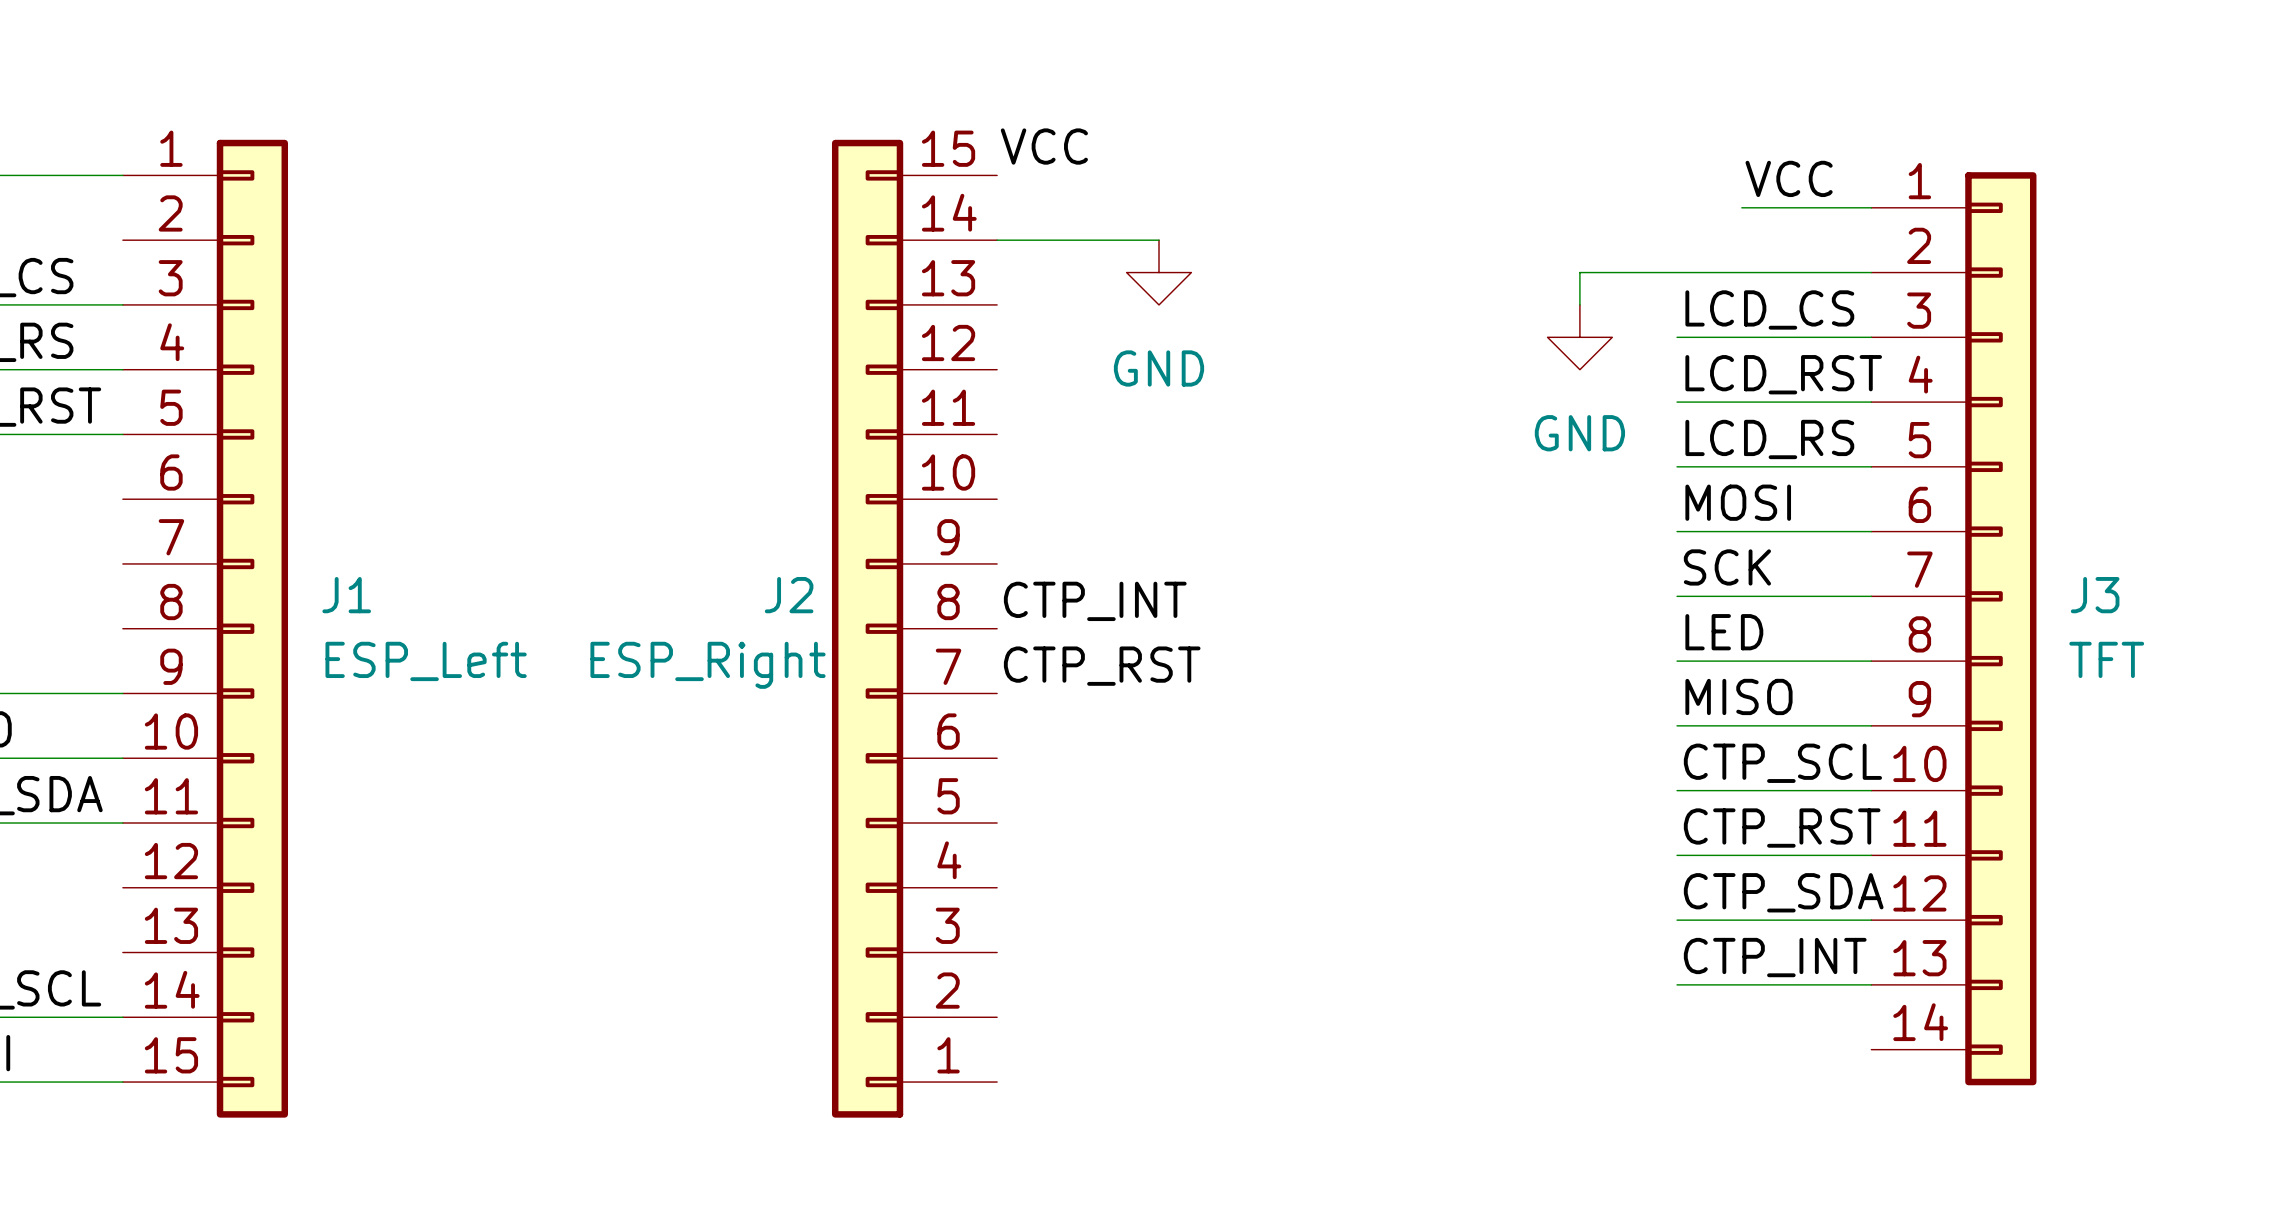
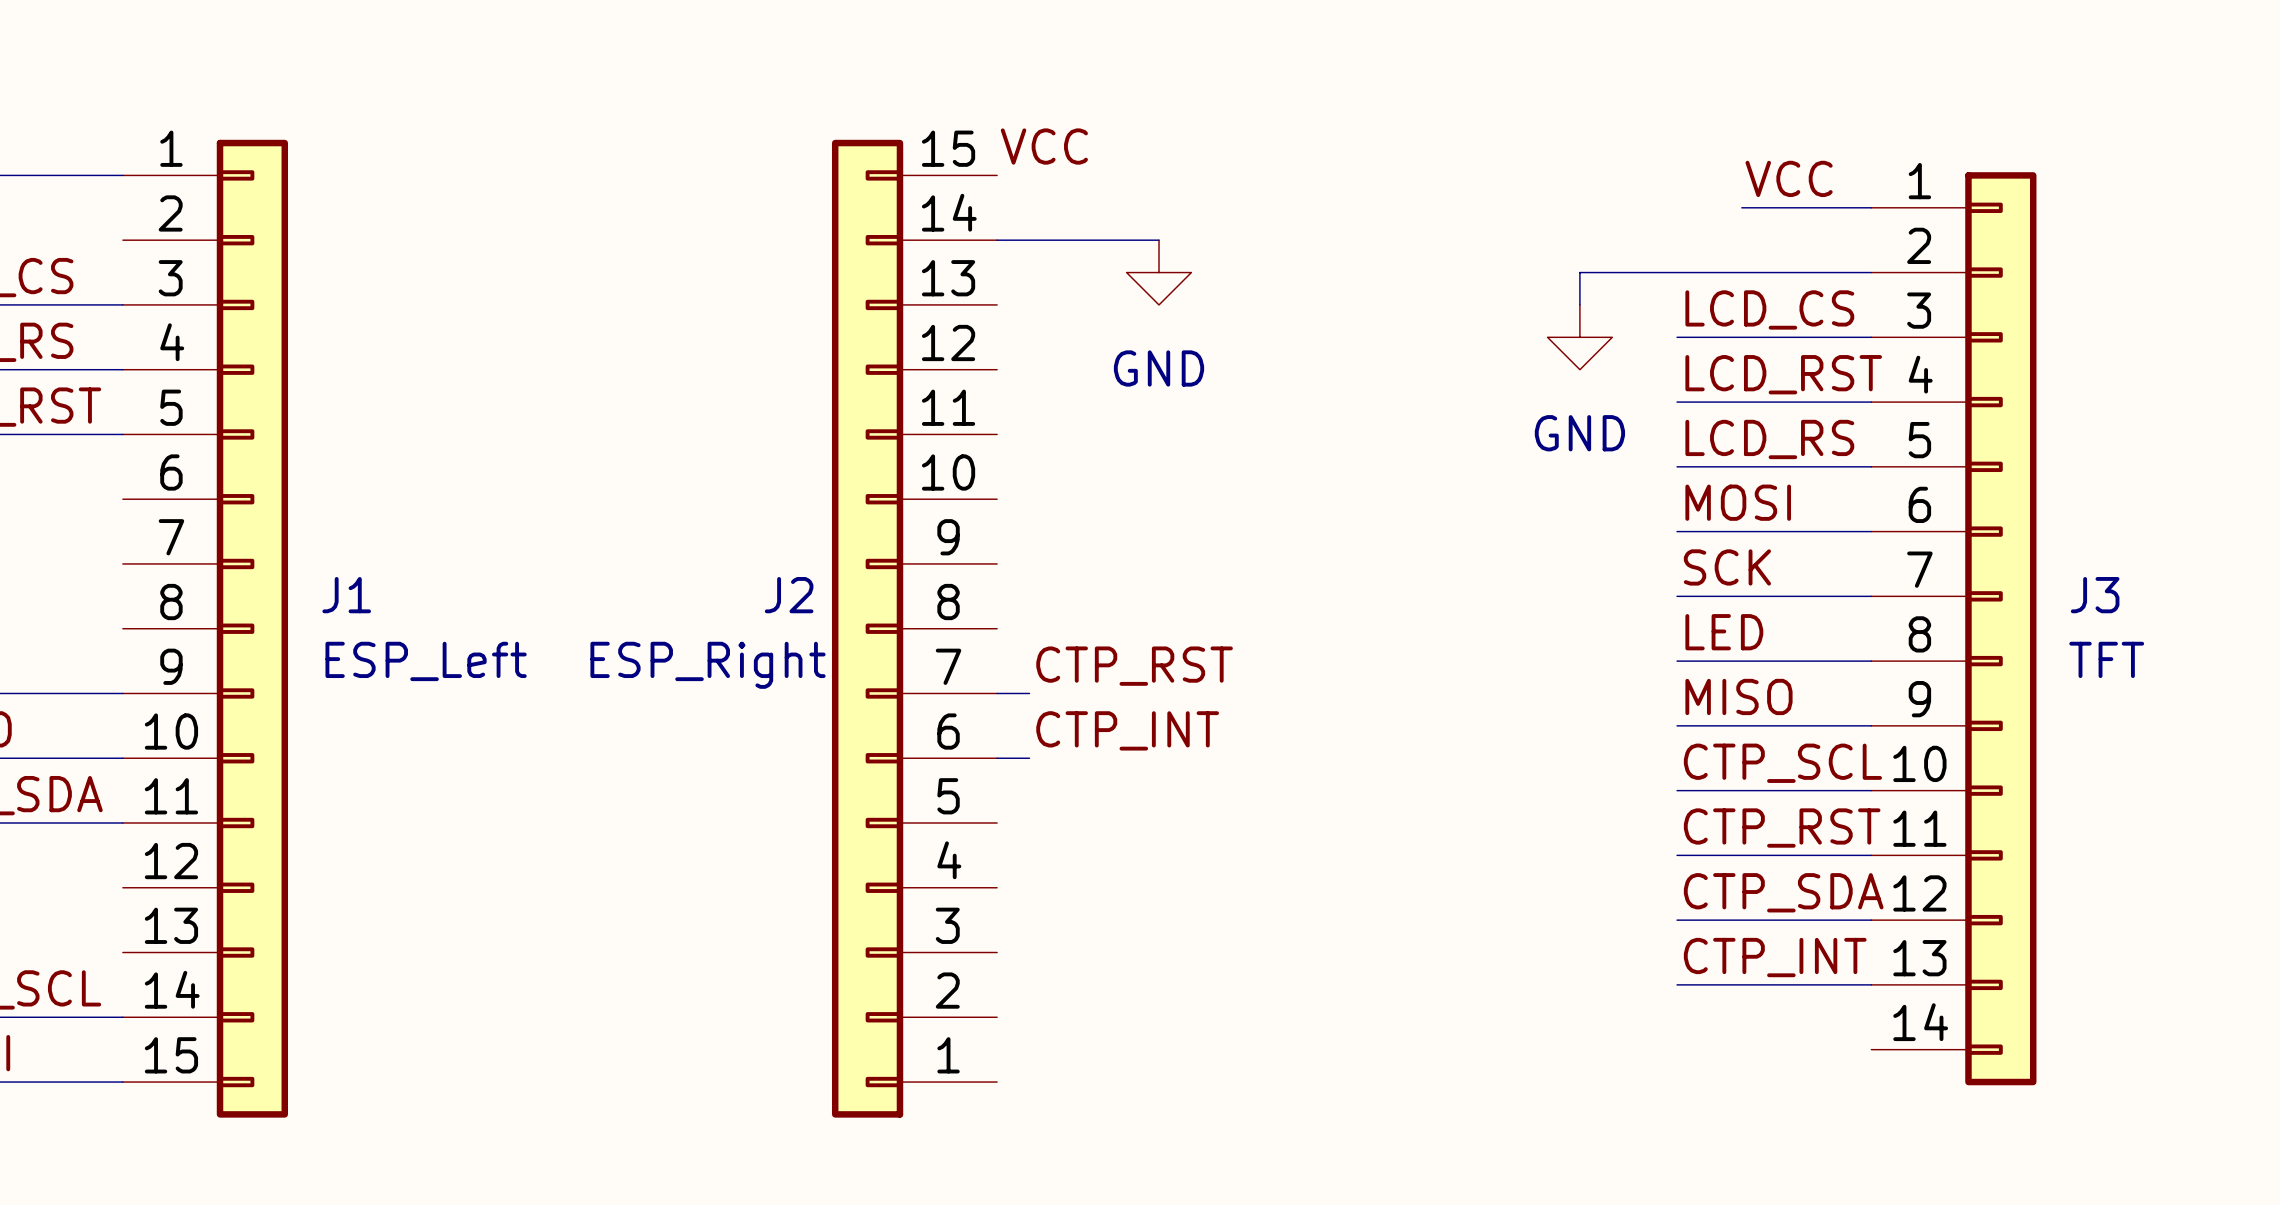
label position: CTP_INT (1095, 601) -> CTP_INT (1127, 730)
label position: CTP_RST (1102, 666) -> CTP_RST (1134, 666)
wire: none -> (997, 693) (1029, 693)
wire: none -> (997, 758) (1029, 758)

